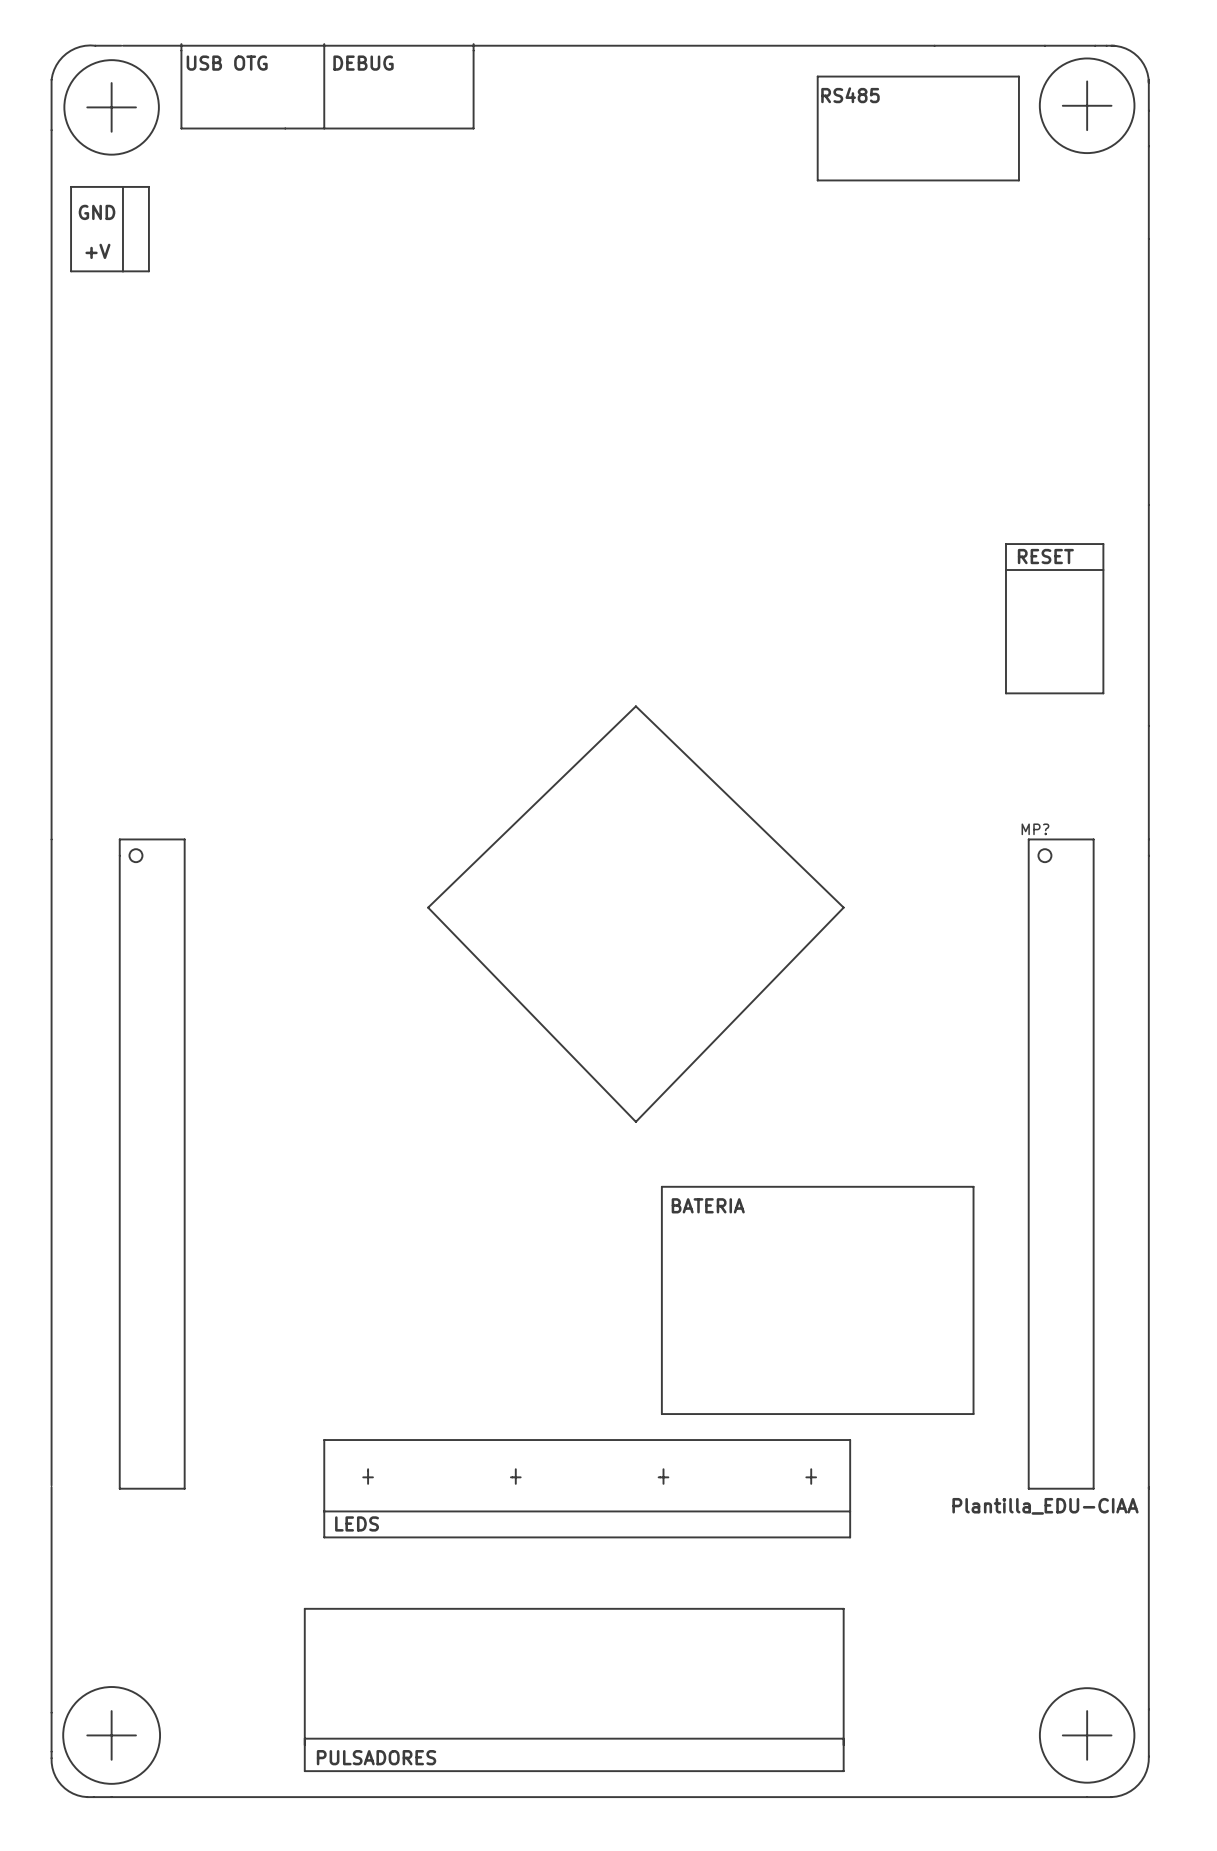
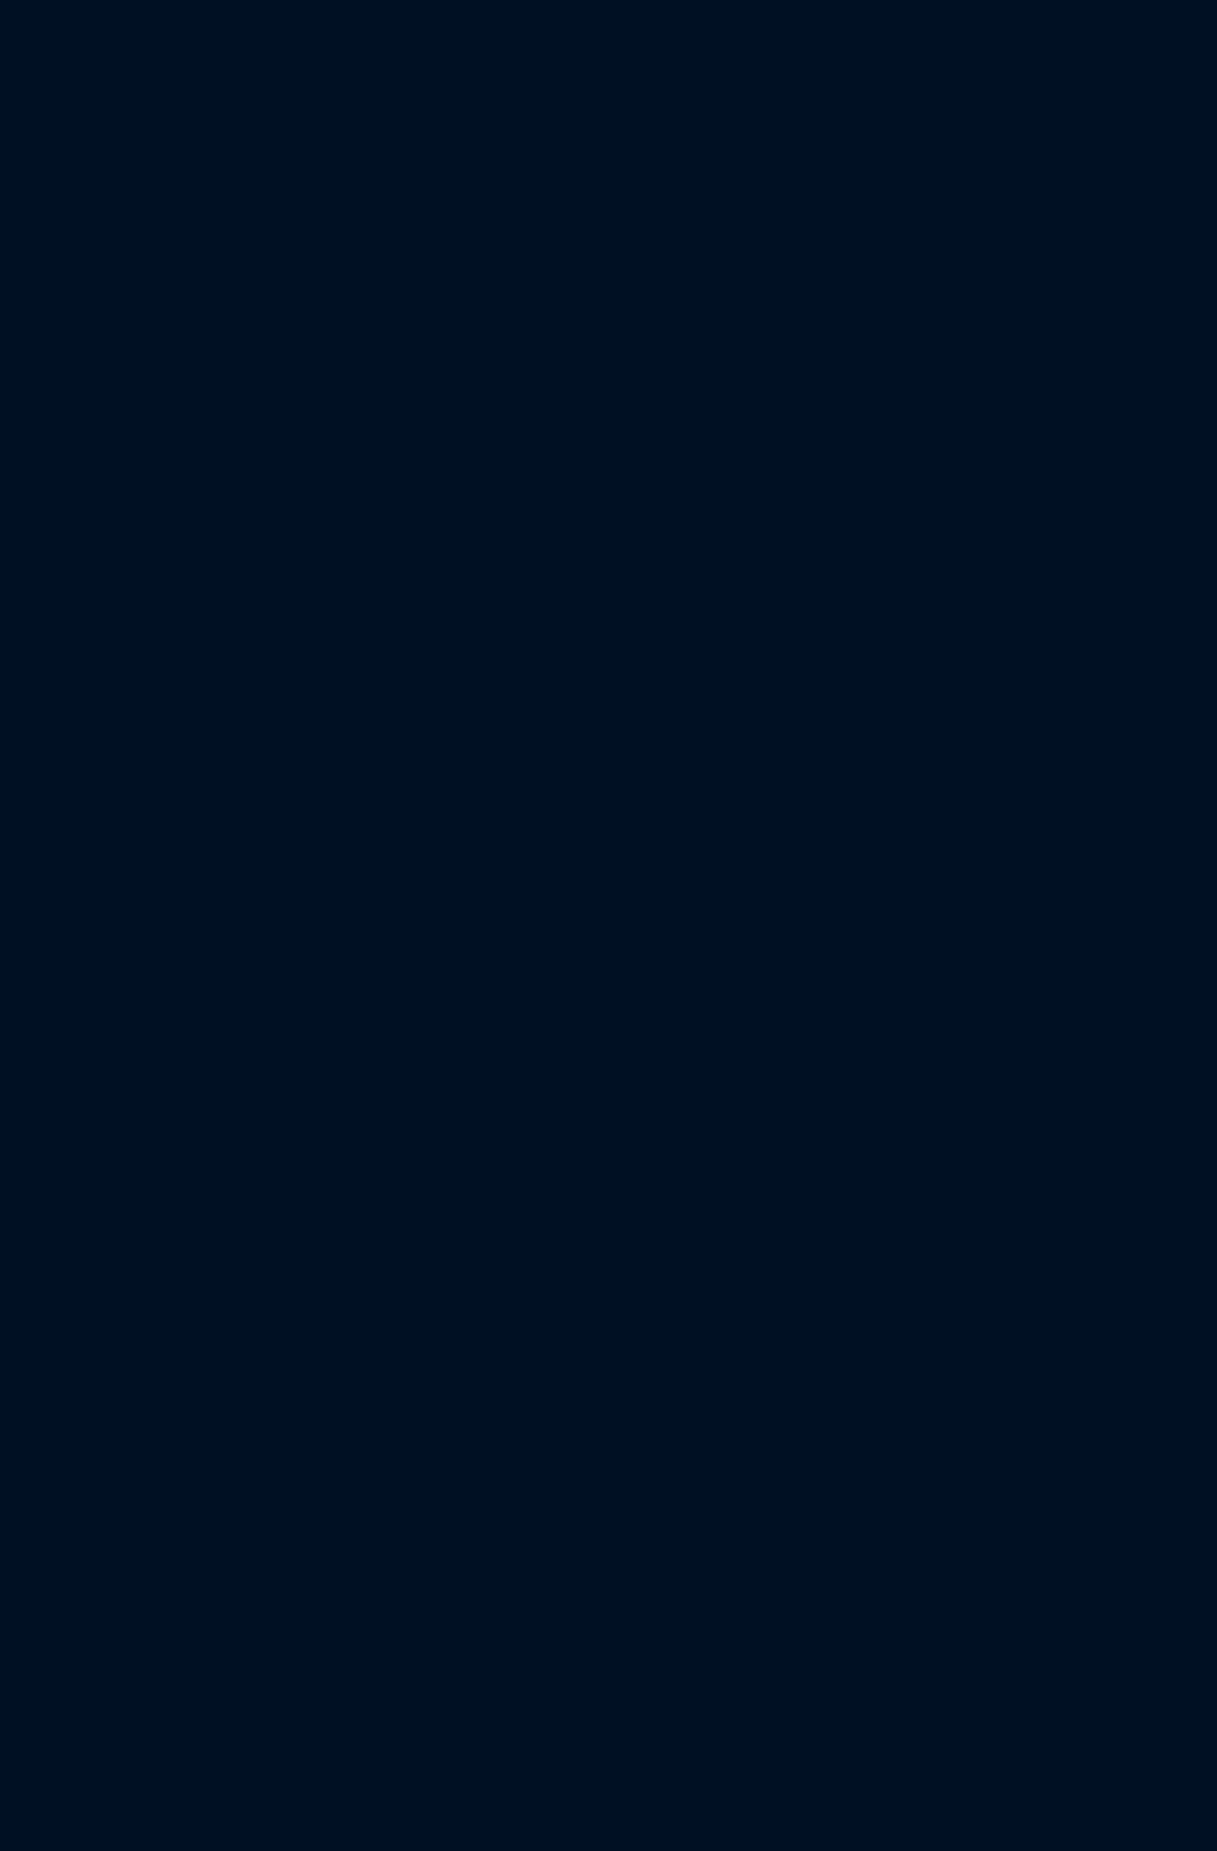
MP?: Plantilla_EDU-CIAA (600, 920) -> none

